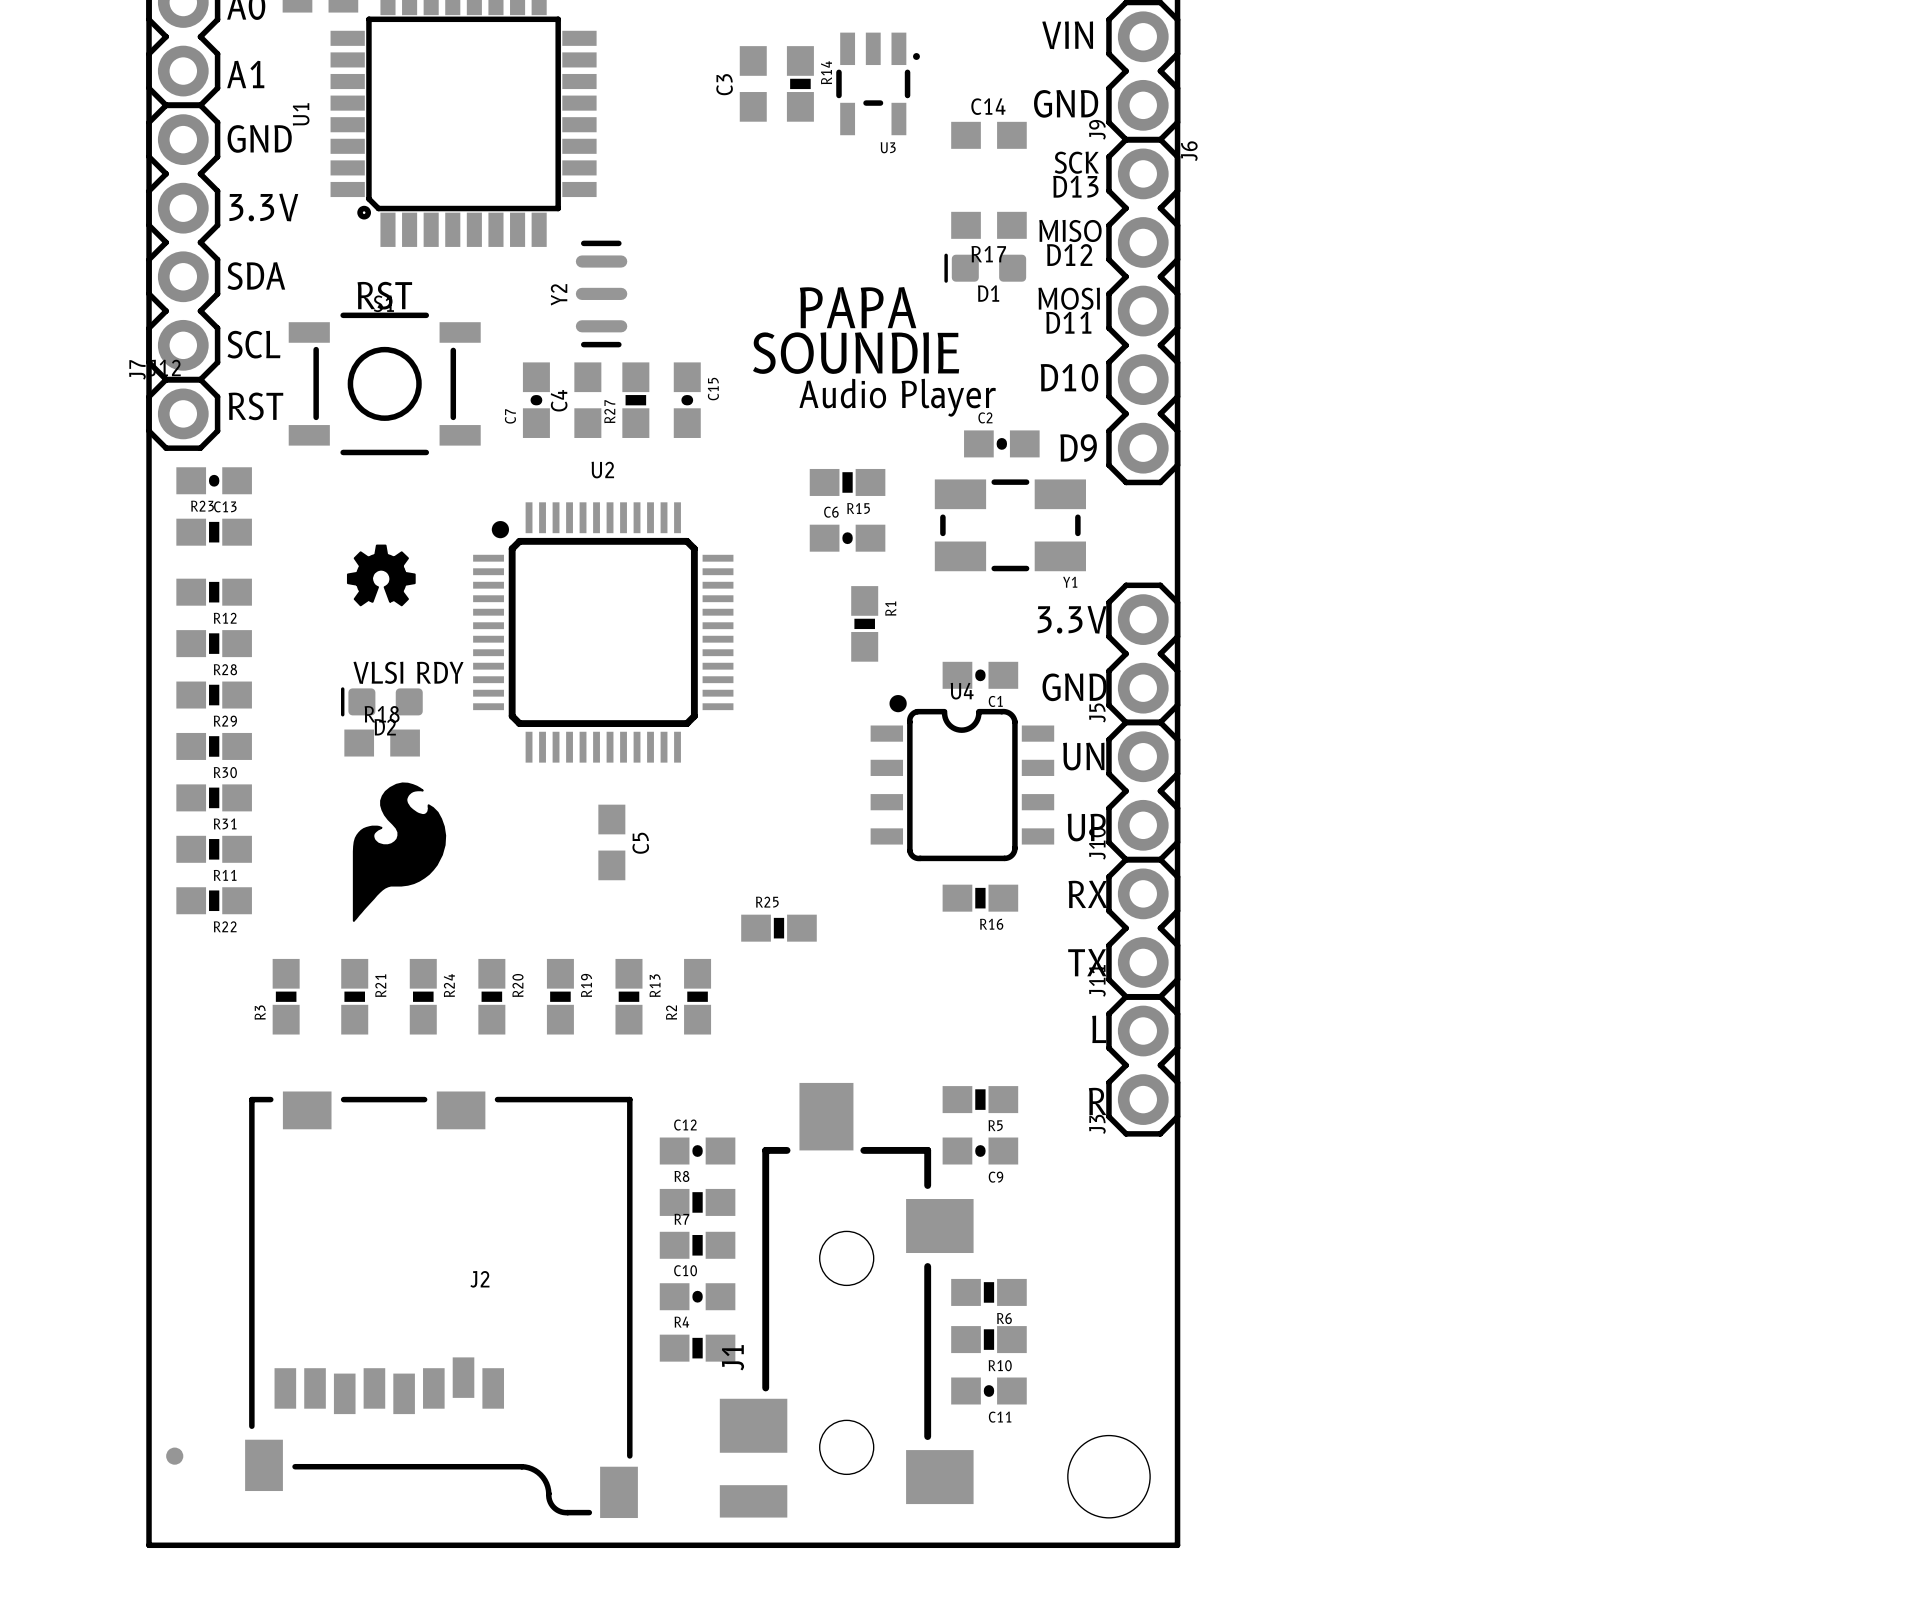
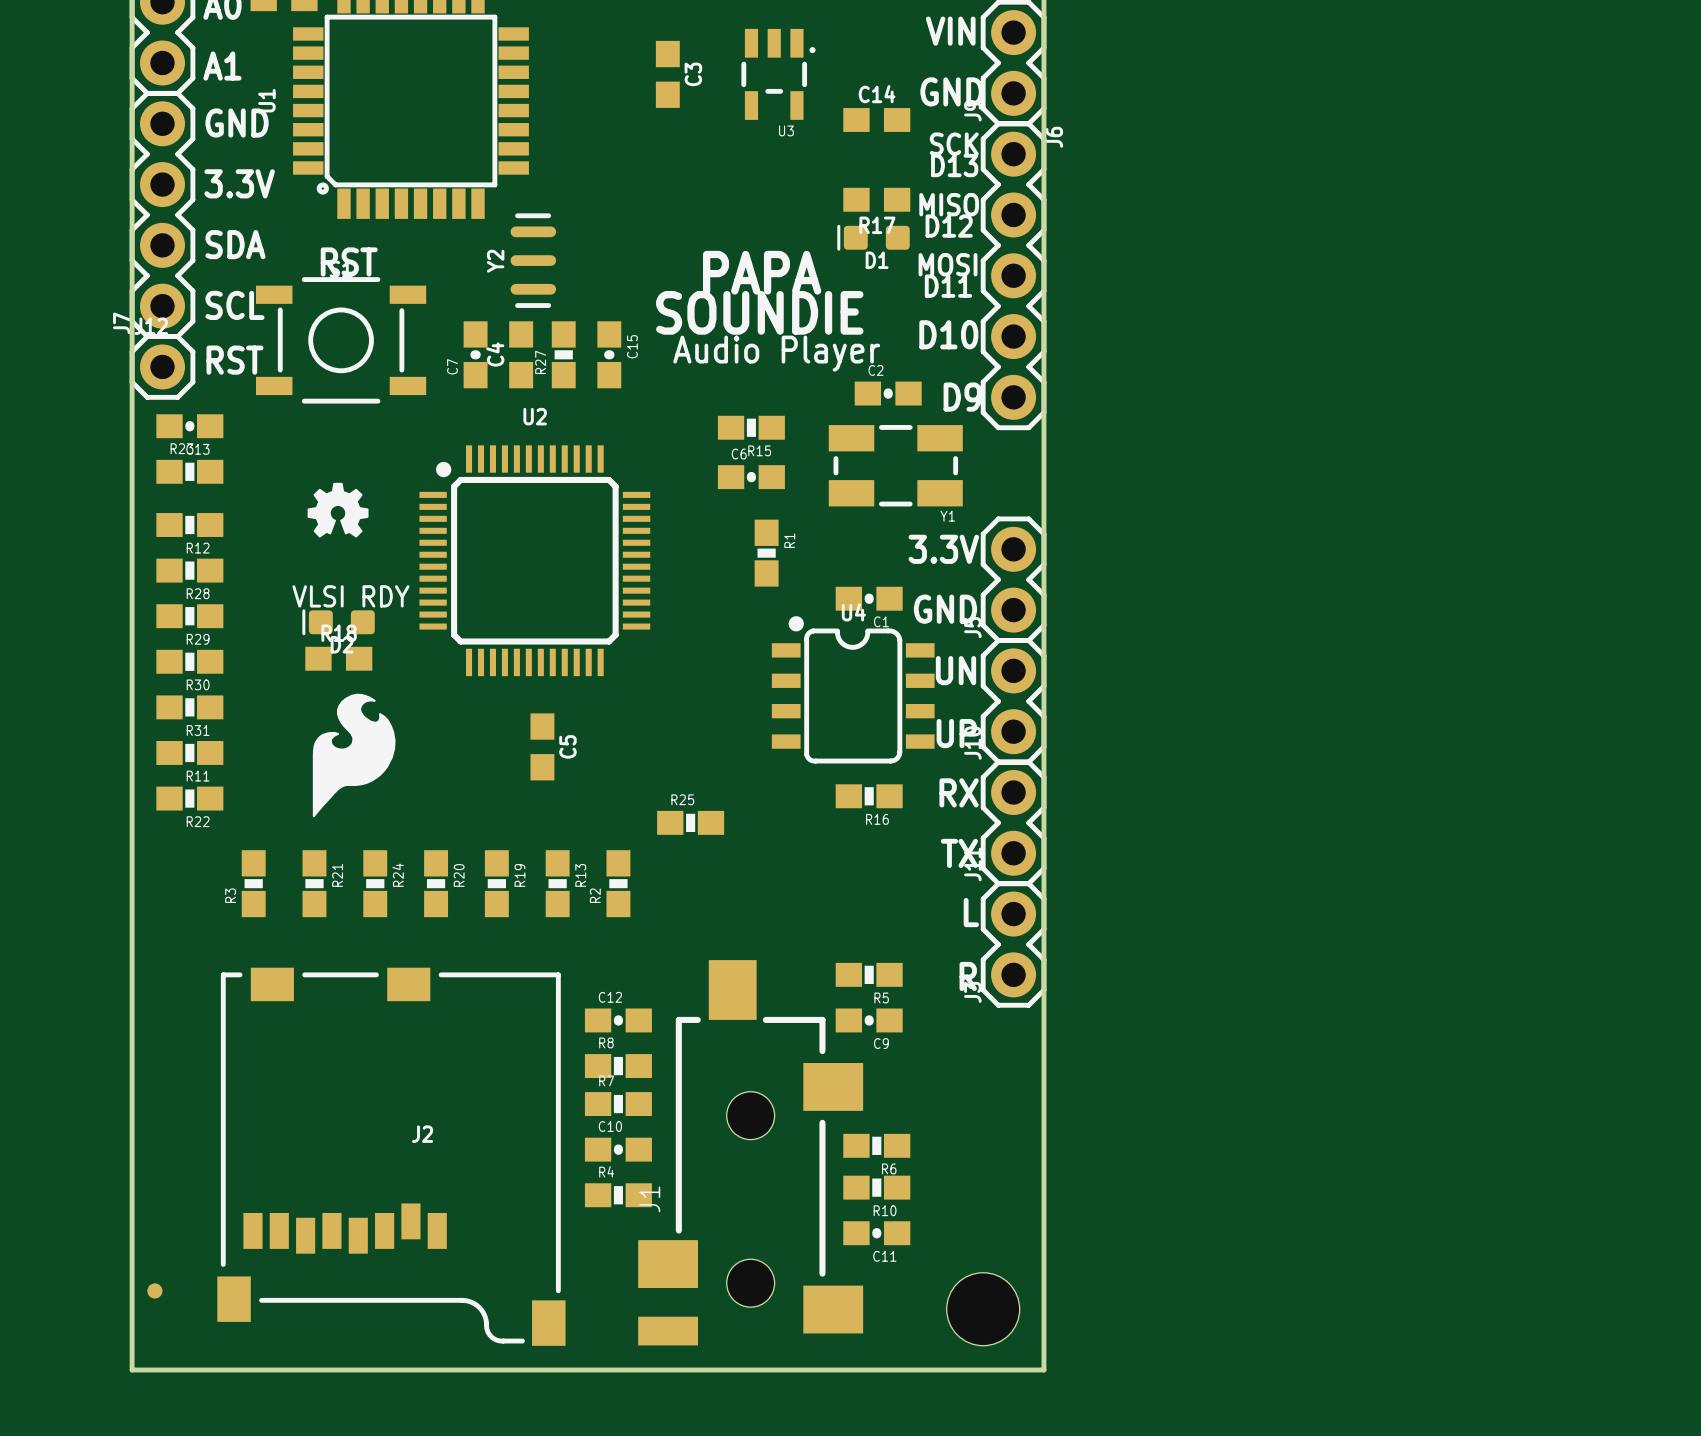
R14: (800, 83) -> none
C3 name position: C3 (724, 84) -> C3 (693, 74)

